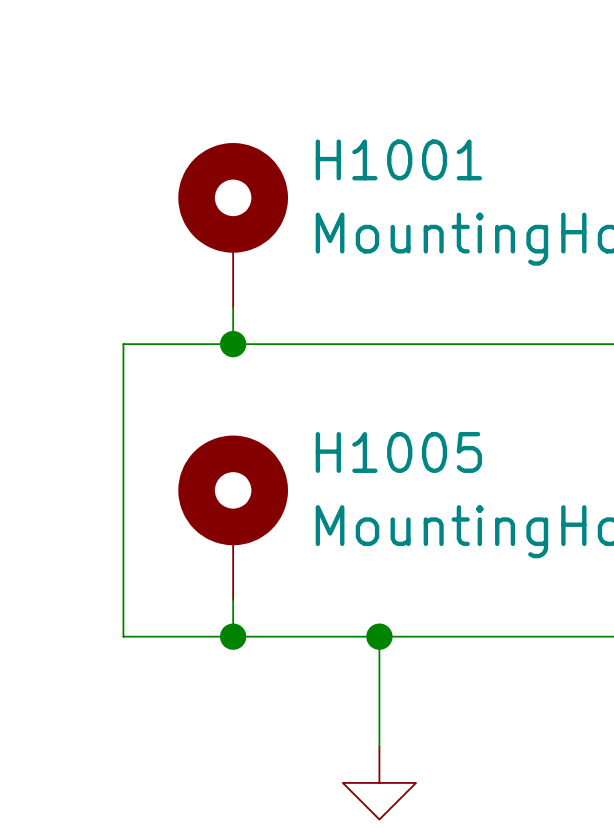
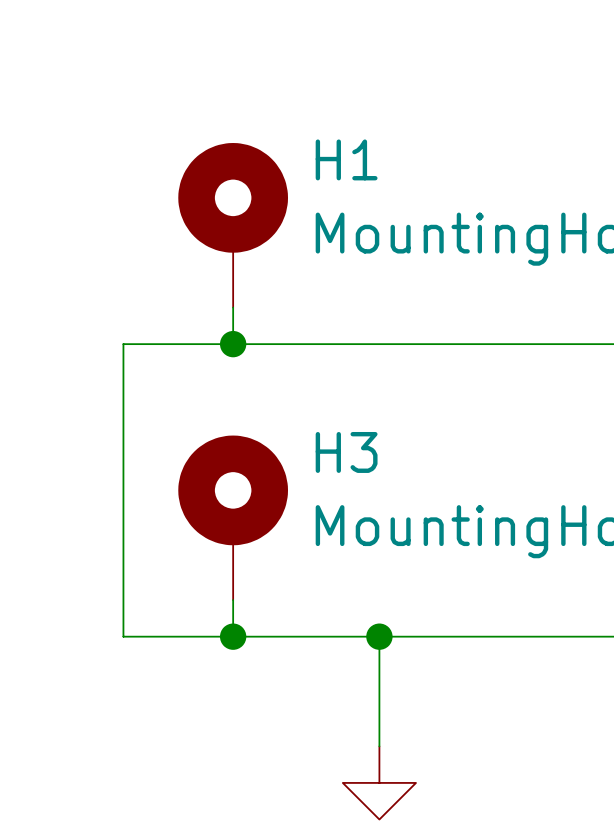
H1001 name: H1001 (398, 159) -> H1 (346, 159)
H1005 name: H1005 (398, 452) -> H3 (346, 452)

